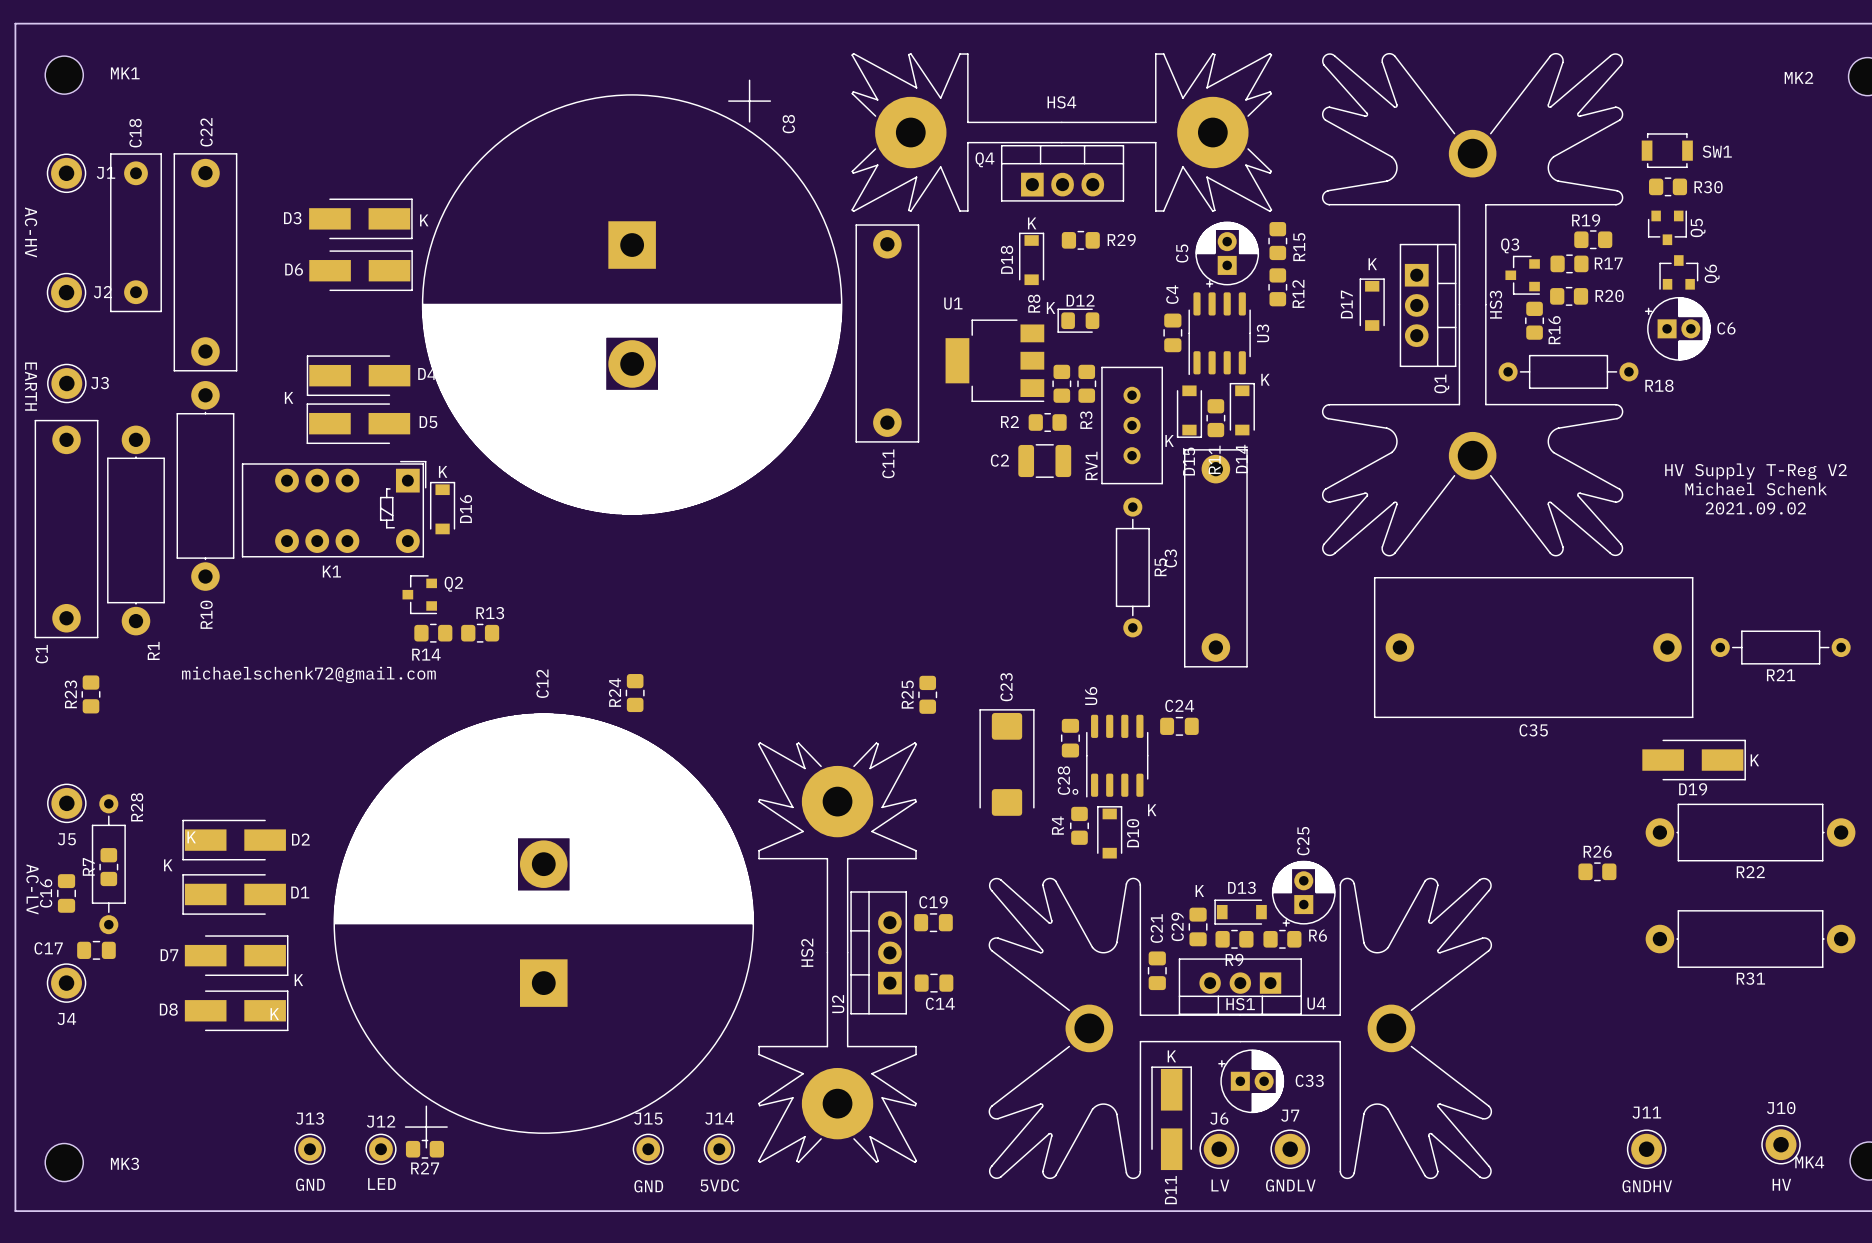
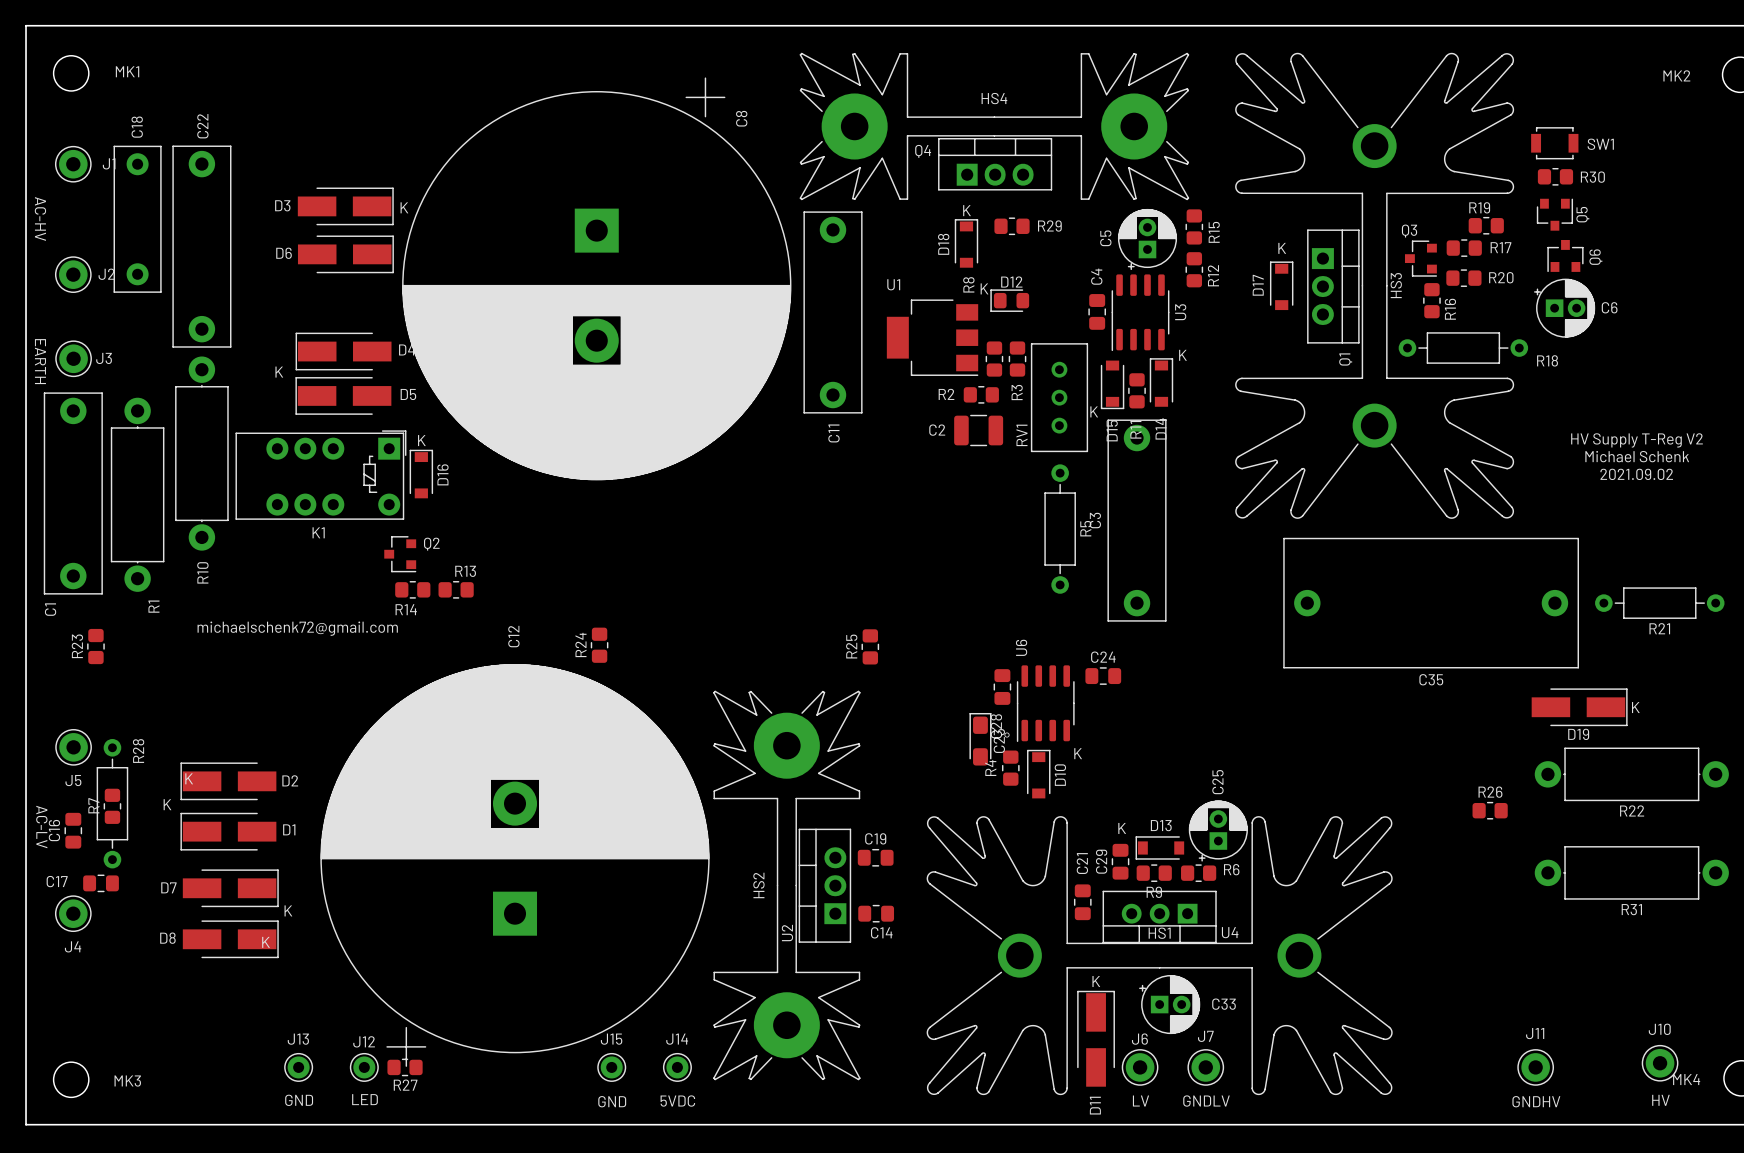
C23 name position: C23 (1006, 687) -> C23 (999, 741)
C23 footprint: [979, 709, 1035, 816] -> [969, 713, 992, 766]

